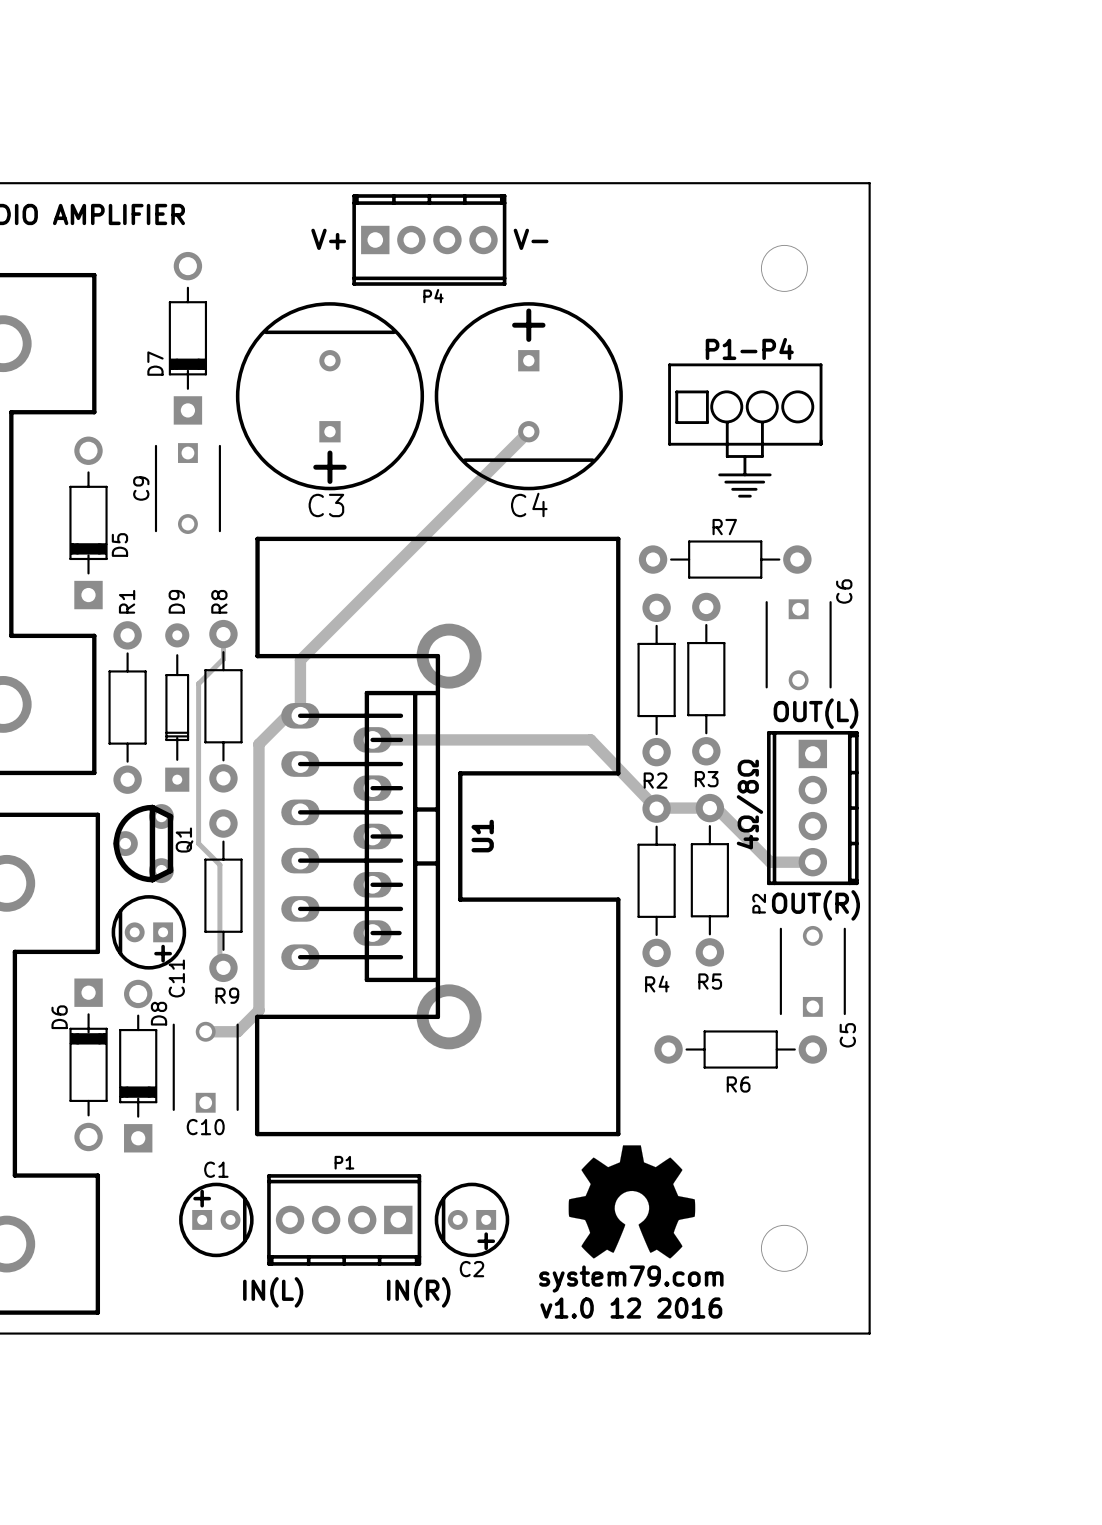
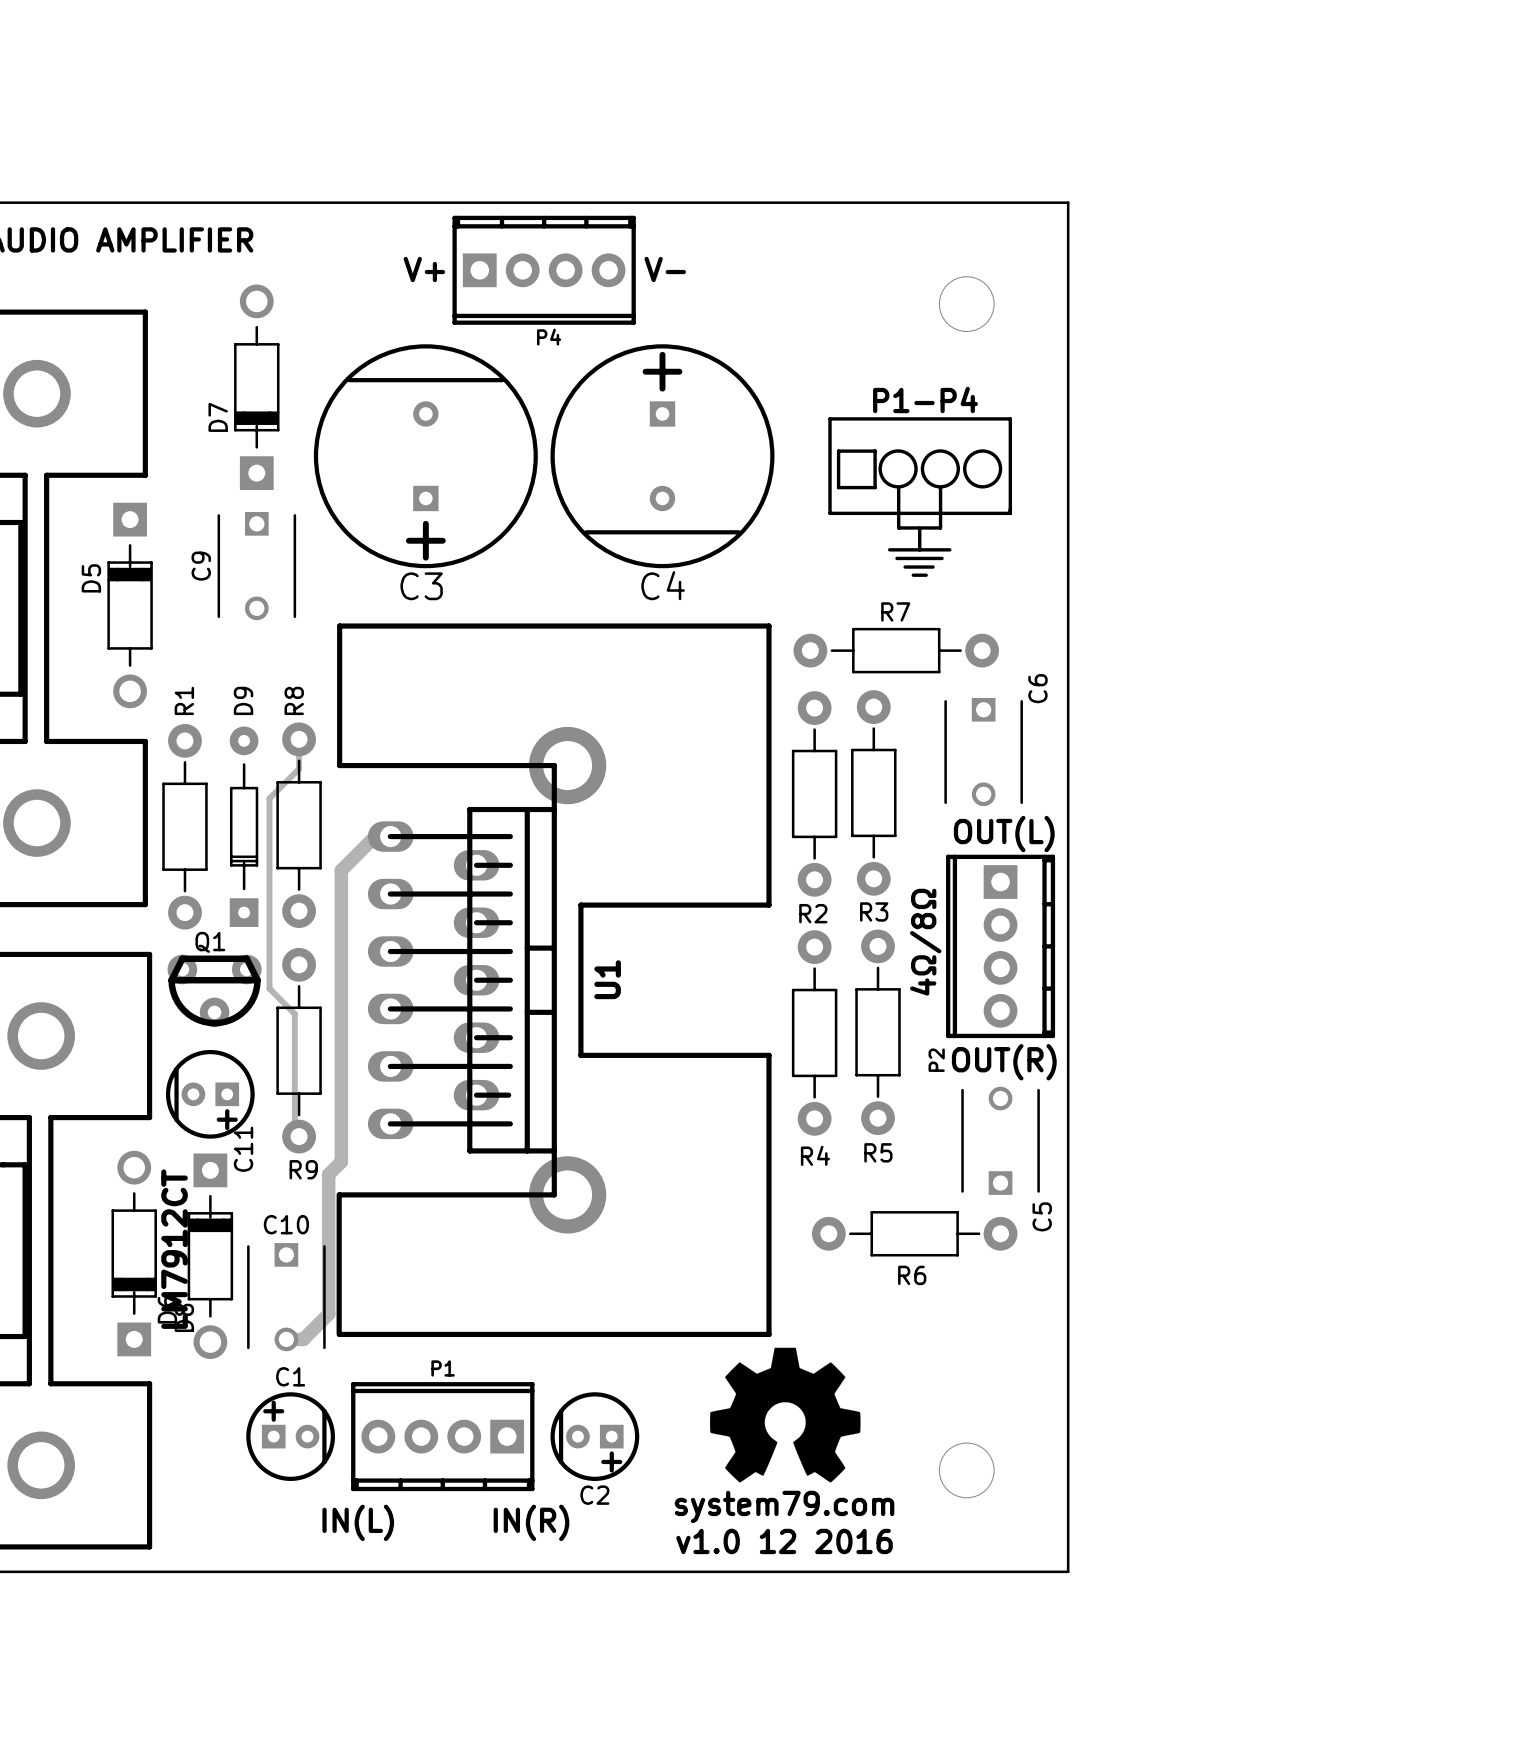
track: (528, 431) (300, 660) (300, 715) -> none
D5 rotation: 0° (88, 522) -> 180° (130, 605)
track: (372, 739) (590, 739) (656, 808) -> none
track: (657, 808) (709, 808) -> none
track: (716, 808) (770, 862) (812, 862) -> none
Q1 rotation: 0° (143, 843) -> 90° counterclockwise (214, 990)
track: (258, 989) (258, 1010) (237, 1031) (205, 1031) -> (341, 1161) (328, 1174) (328, 1314) (303, 1339) (286, 1339)
part value: none -> LM7912CT (174, 1249)
D6 rotation: 0° (88, 1064) -> 180° (134, 1253)
D8 rotation: 0° (138, 1066) -> 180° (210, 1256)
C10 rotation: 0° (205, 1067) -> 180° (286, 1297)

